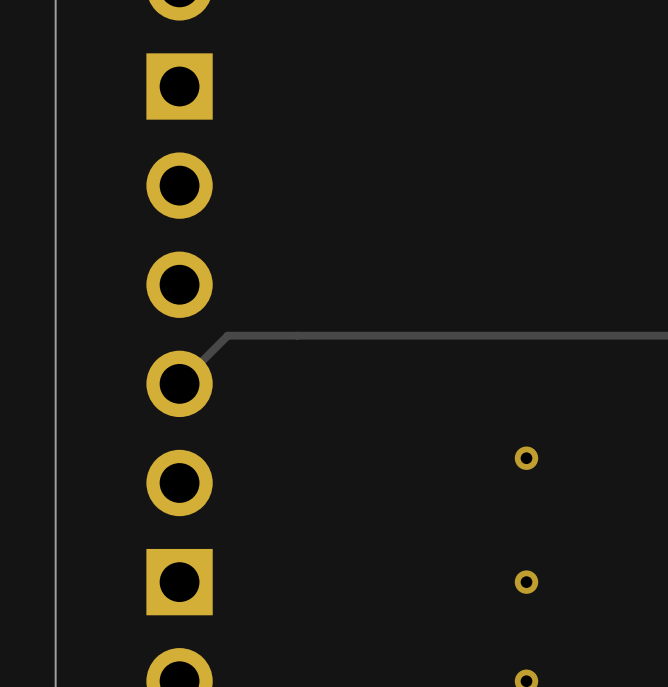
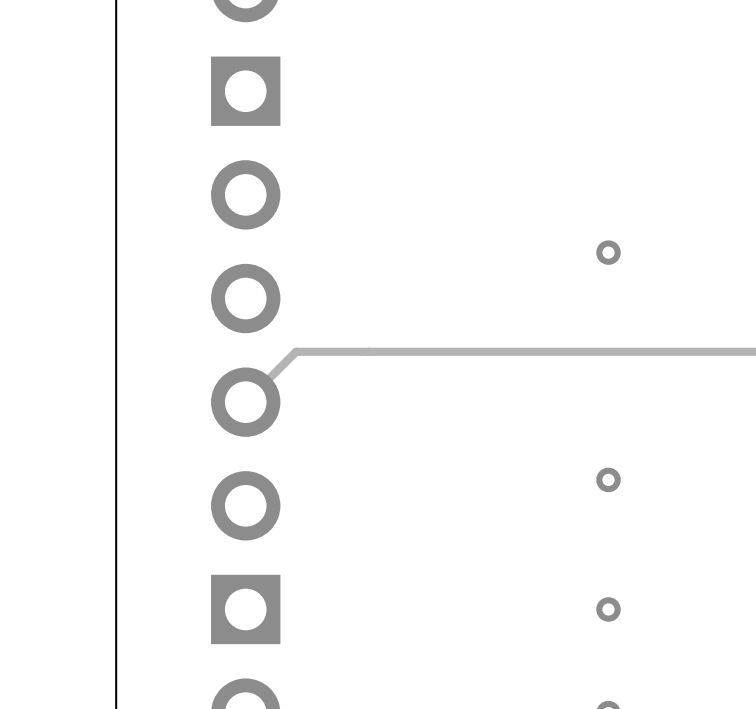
via: none -> (608, 252)

